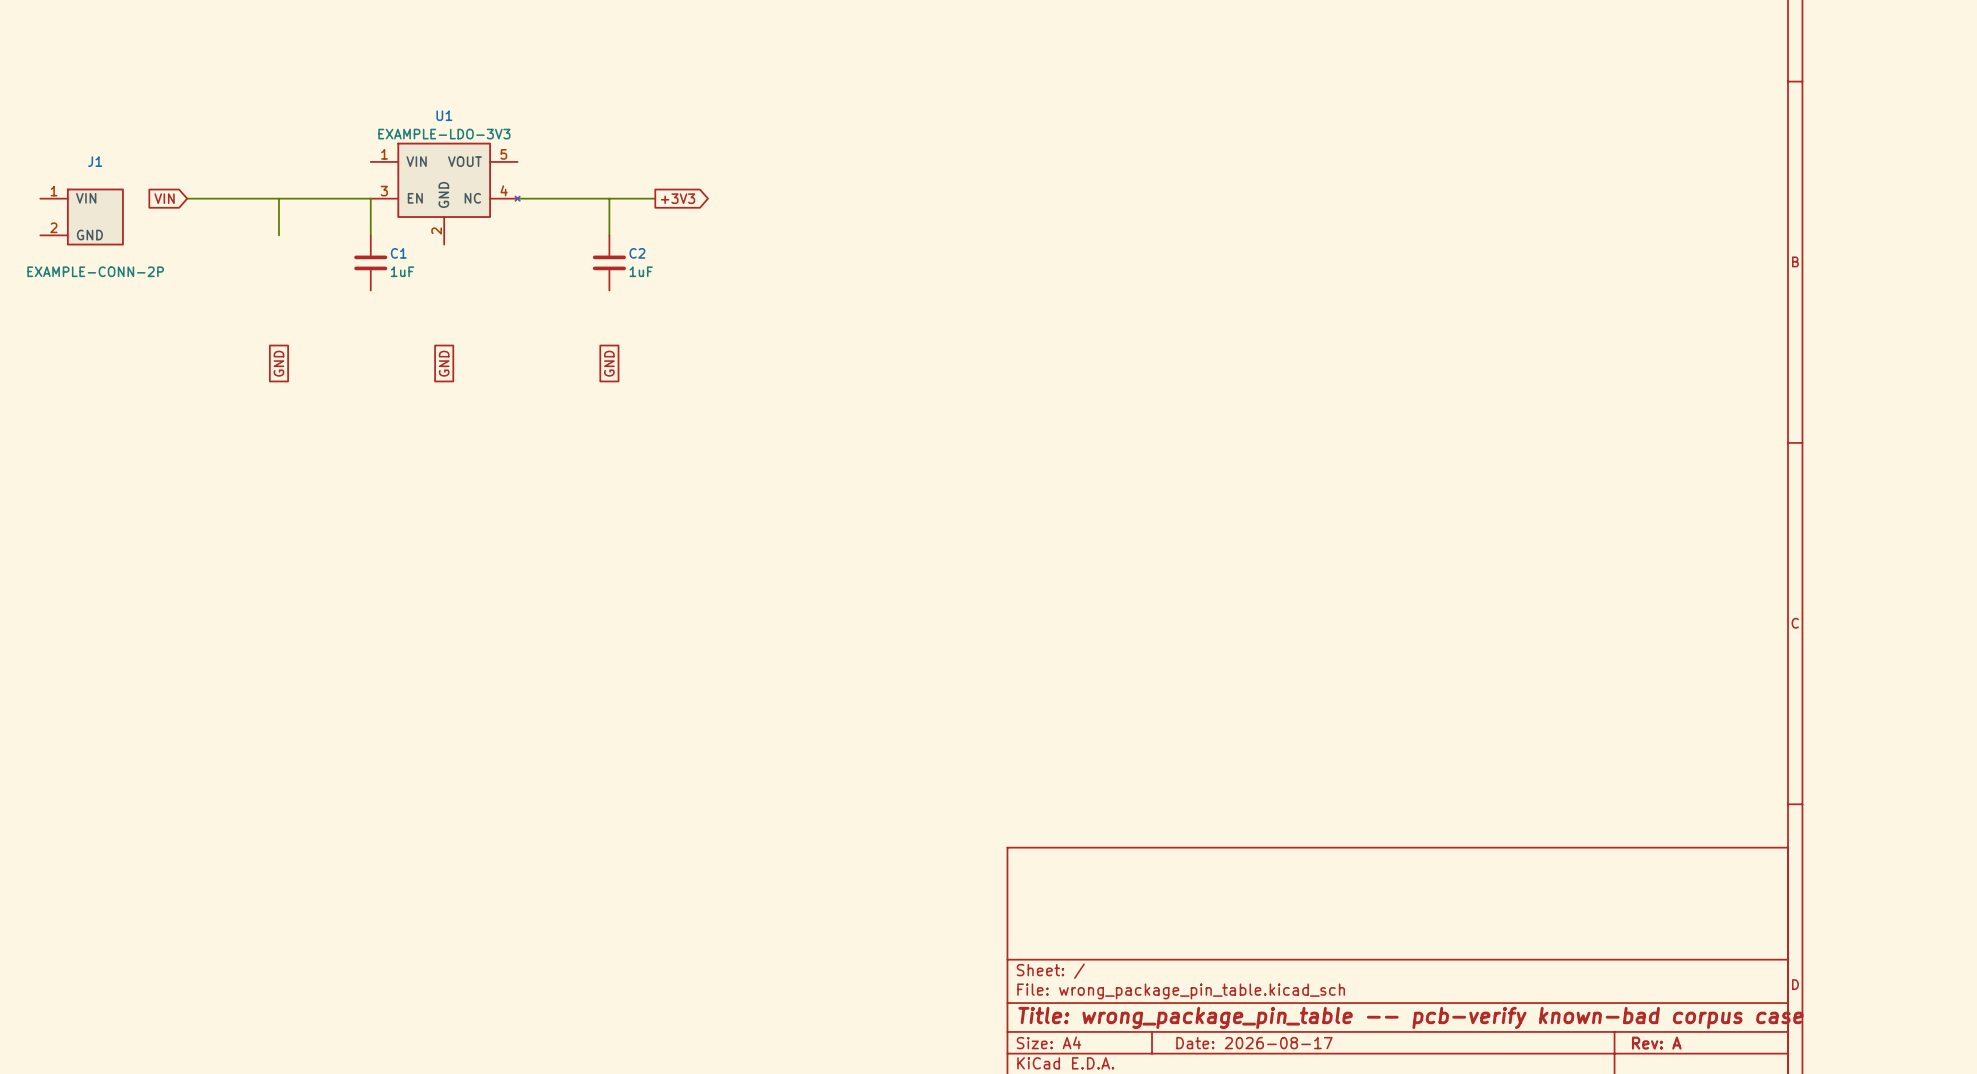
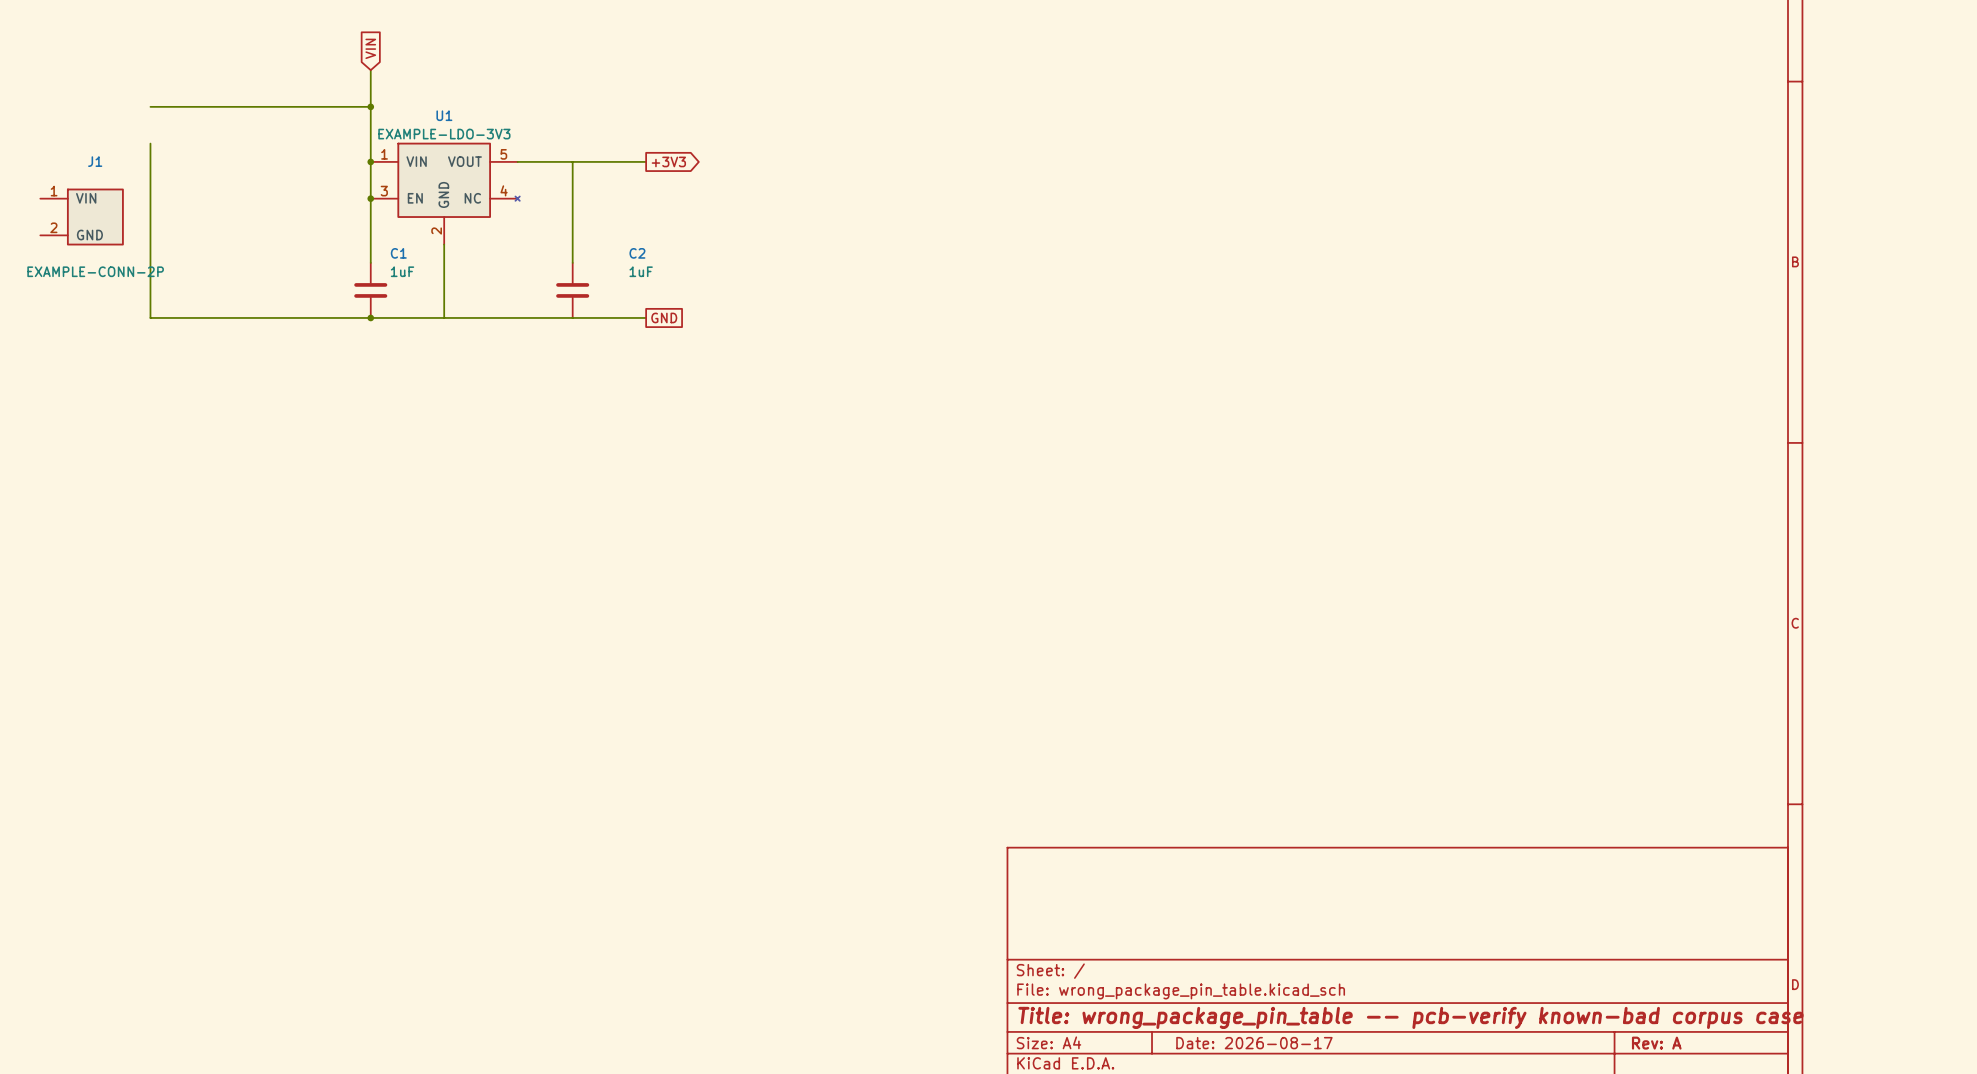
global label: none -> VIN (370, 48)
wire: none -> (150, 106) (370, 106)
junction: none -> (370, 106)
wire: none -> (150, 143) (150, 317) (646, 317)
junction: none -> (370, 161)
wire: none -> (517, 161) (646, 161)
wire: none -> (572, 161) (572, 262)
global label: VIN (164, 198) -> none
wire: (187, 198) (370, 198) -> (370, 70) (370, 198)
wire: (278, 198) (278, 235) -> none
junction: none -> (370, 198)
wire: (517, 198) (655, 198) -> none
wire: (609, 198) (609, 235) -> none
global label position: +3V3 (678, 198) -> +3V3 (668, 161)
wire: none -> (444, 244) (444, 317)
C1 position: (370, 262) -> (370, 290)
C2 position: (609, 262) -> (572, 290)
junction: none -> (370, 317)
global label: GND (278, 363) -> none
global label: GND (444, 363) -> none
global label rotation: 0° (609, 363) -> 90° counterclockwise (664, 317)
global label position: GND (609, 363) -> GND (664, 317)

